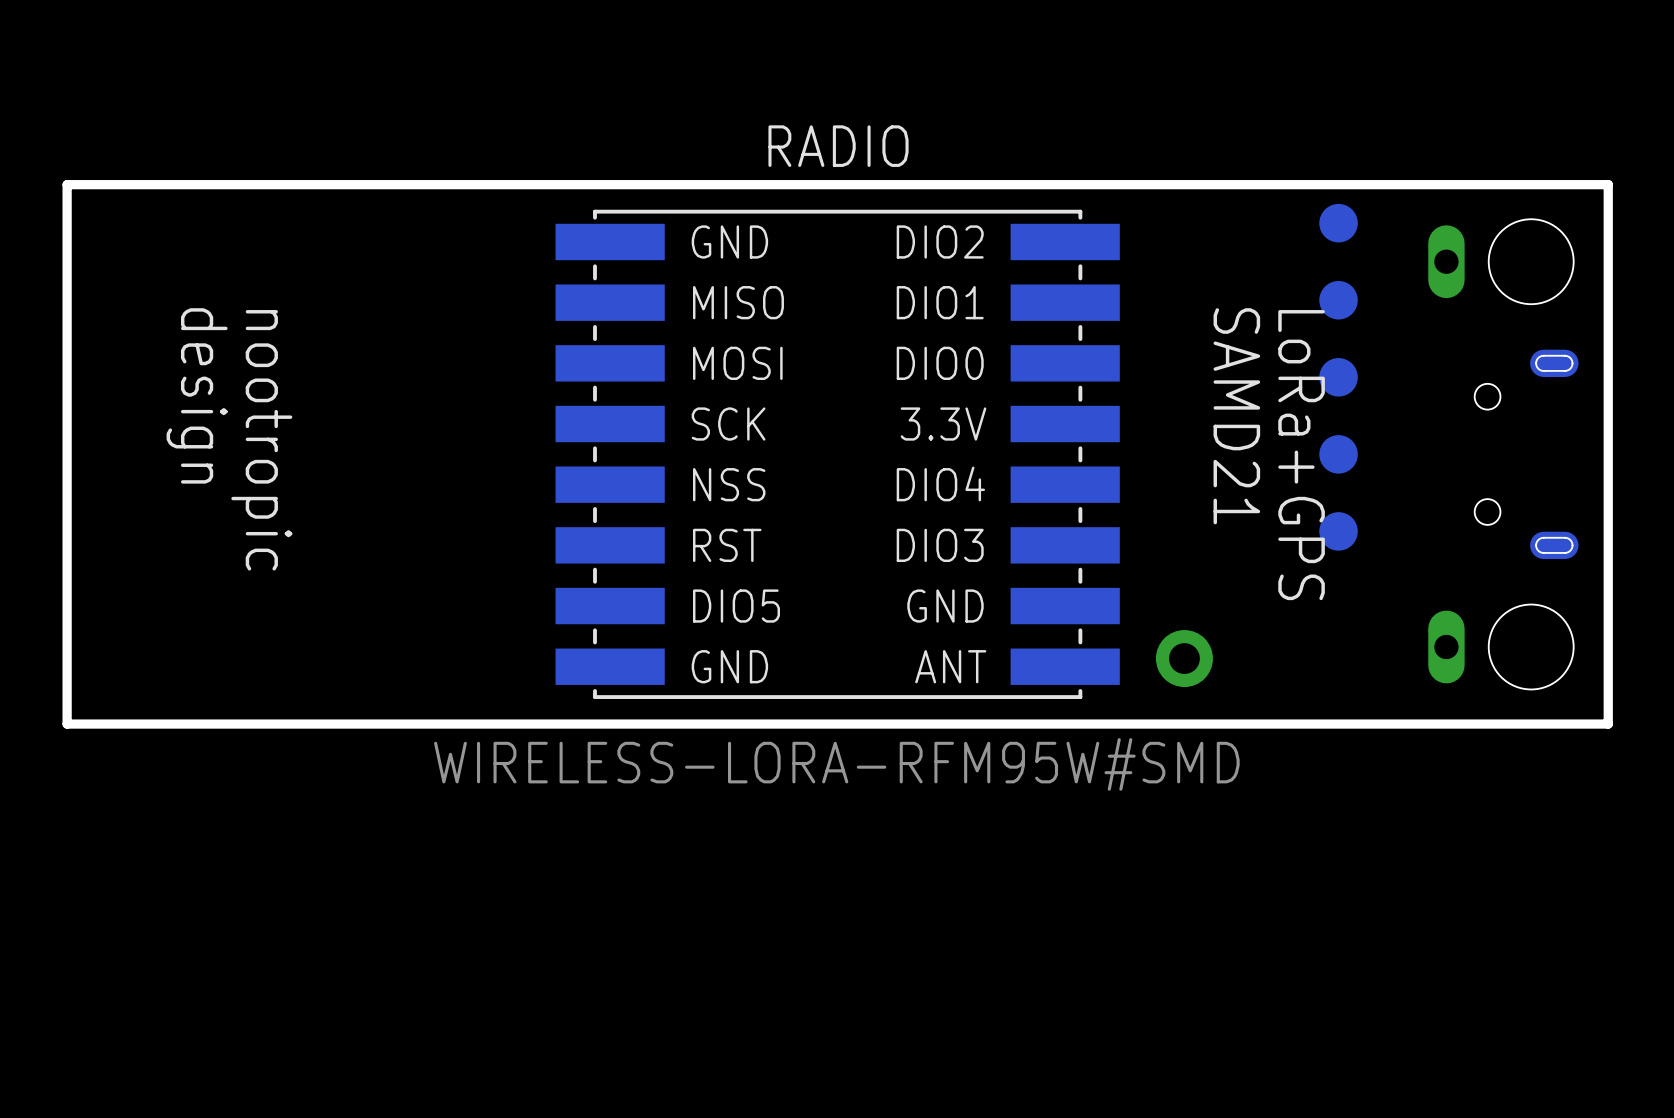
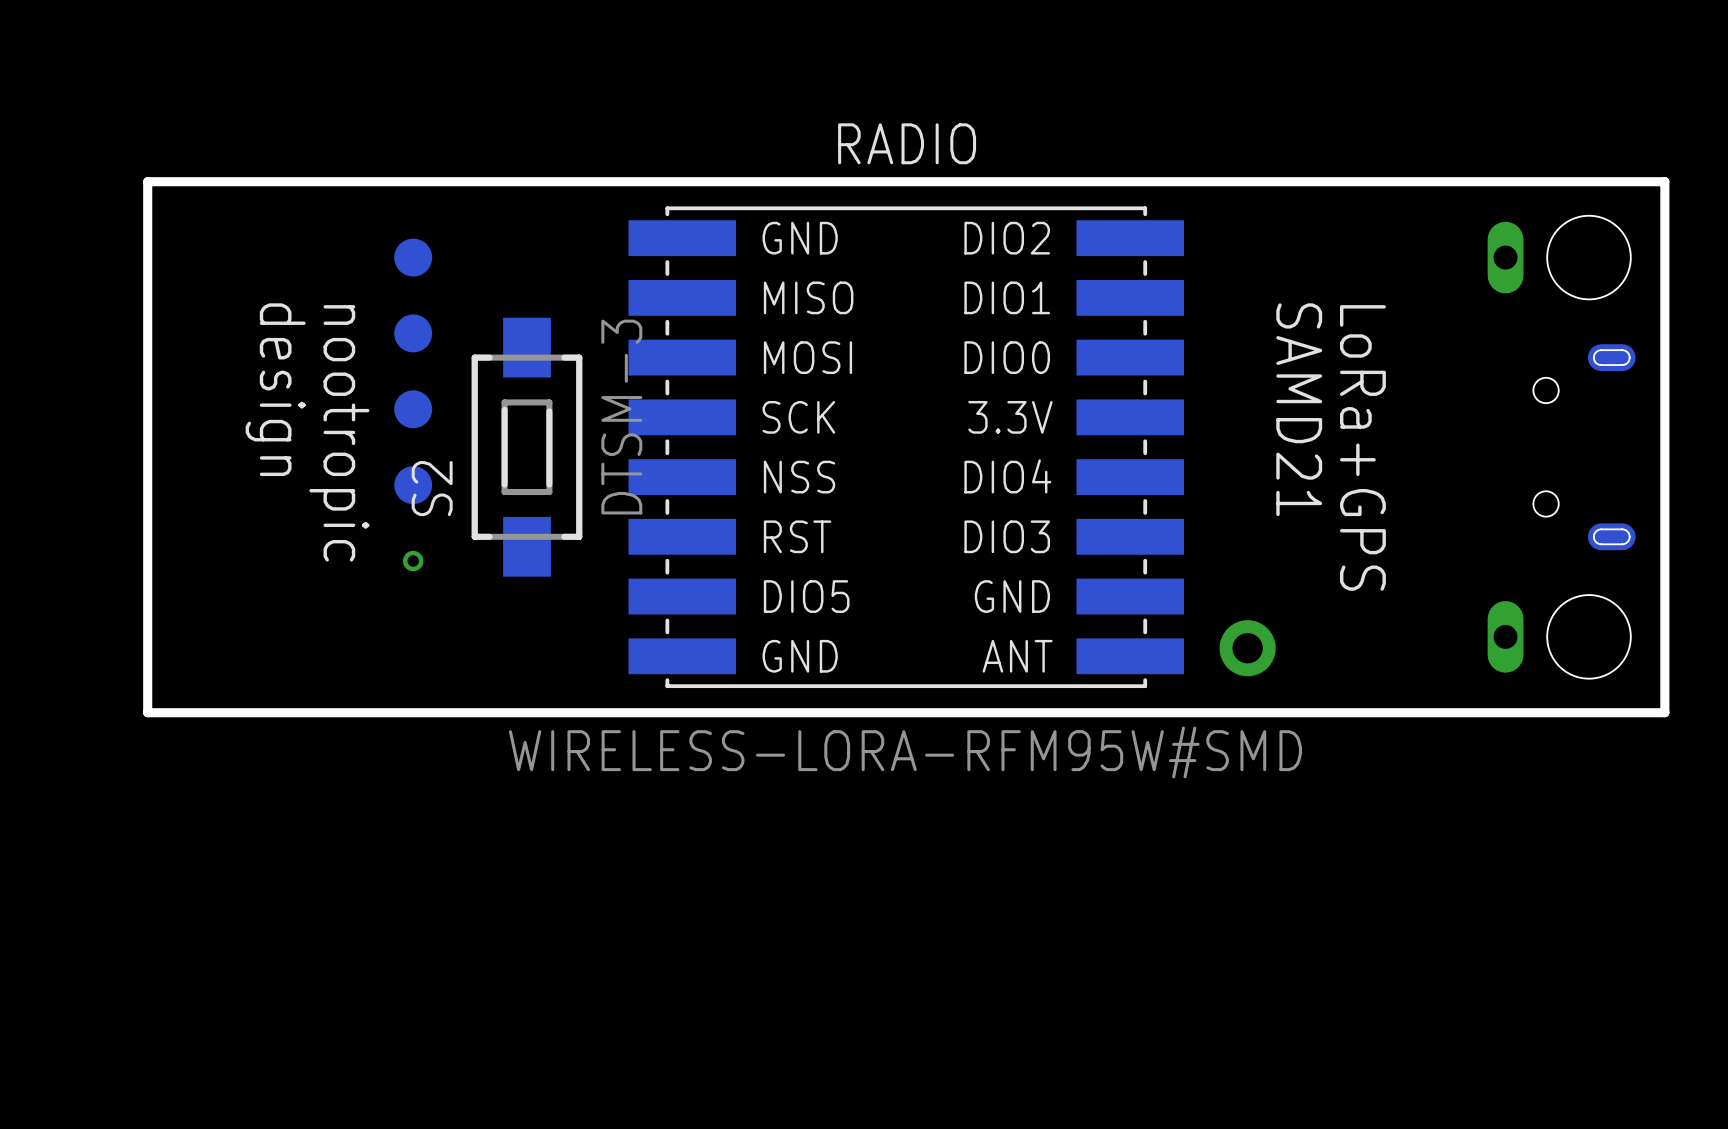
part: (1338, 223) -> none
part: none -> (413, 257)
part: (1338, 300) -> none
part: none -> (413, 333)
part: (1338, 377) -> none
part: none -> (413, 409)
S2: none -> DTSM-3 (526, 447)
part: (1338, 454) -> none
part: none -> (413, 485)
part: (1338, 531) -> none
part: none -> (413, 561)

